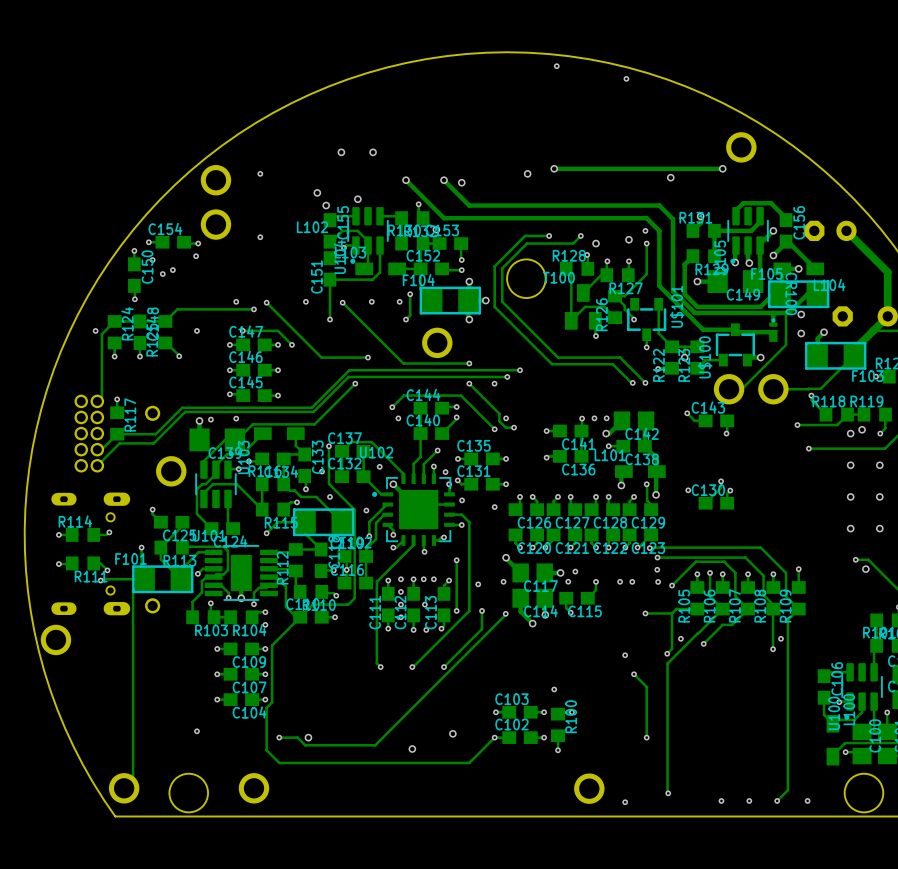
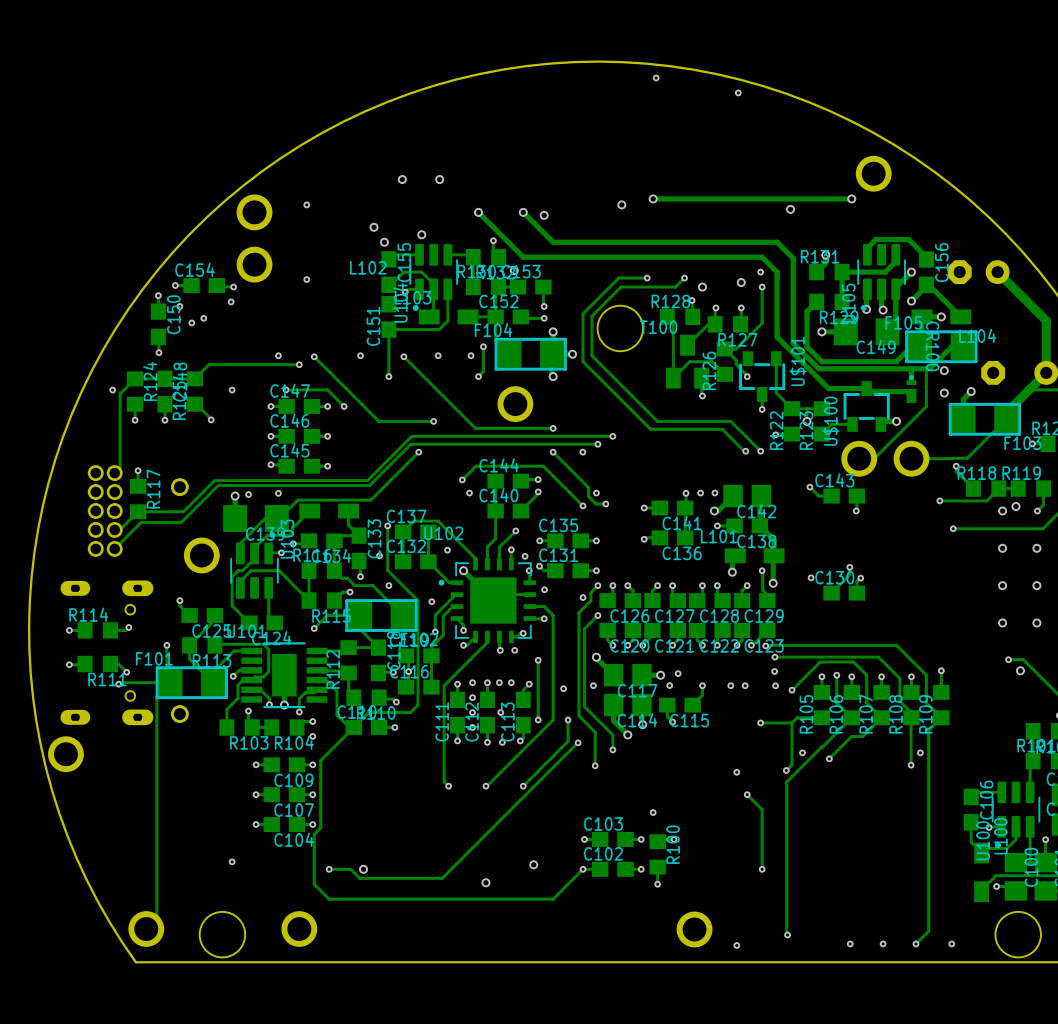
track: none -> (597, 585) (590, 592) (590, 600) (578, 612) (578, 715) (595, 732) (595, 765)
via: none -> (597, 585)
track: none -> (597, 615) (584, 628) (584, 706) (612, 734) (612, 749)
via: none -> (597, 615)
via: none -> (514, 650)
track: (505, 613) (490, 630) -> none
via: (505, 613) -> none
via: none -> (578, 742)
via: none -> (612, 749)
via: none -> (595, 765)

